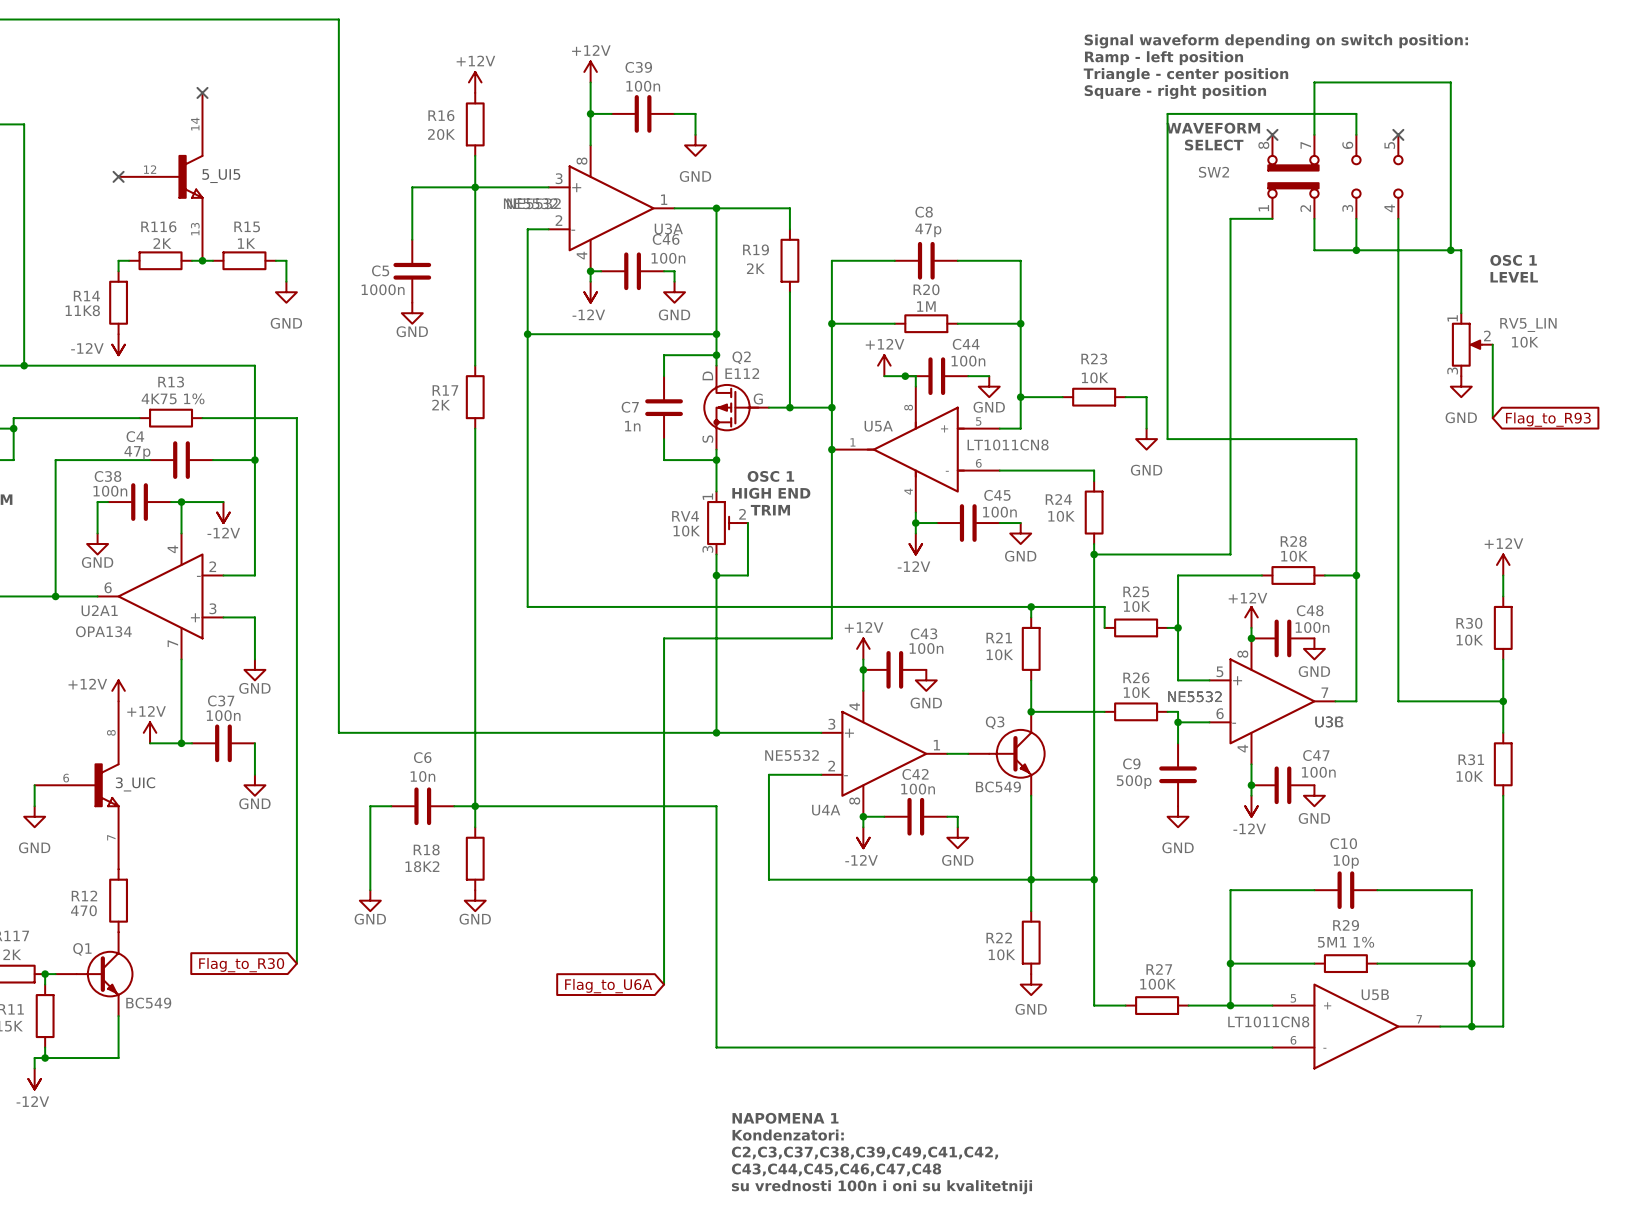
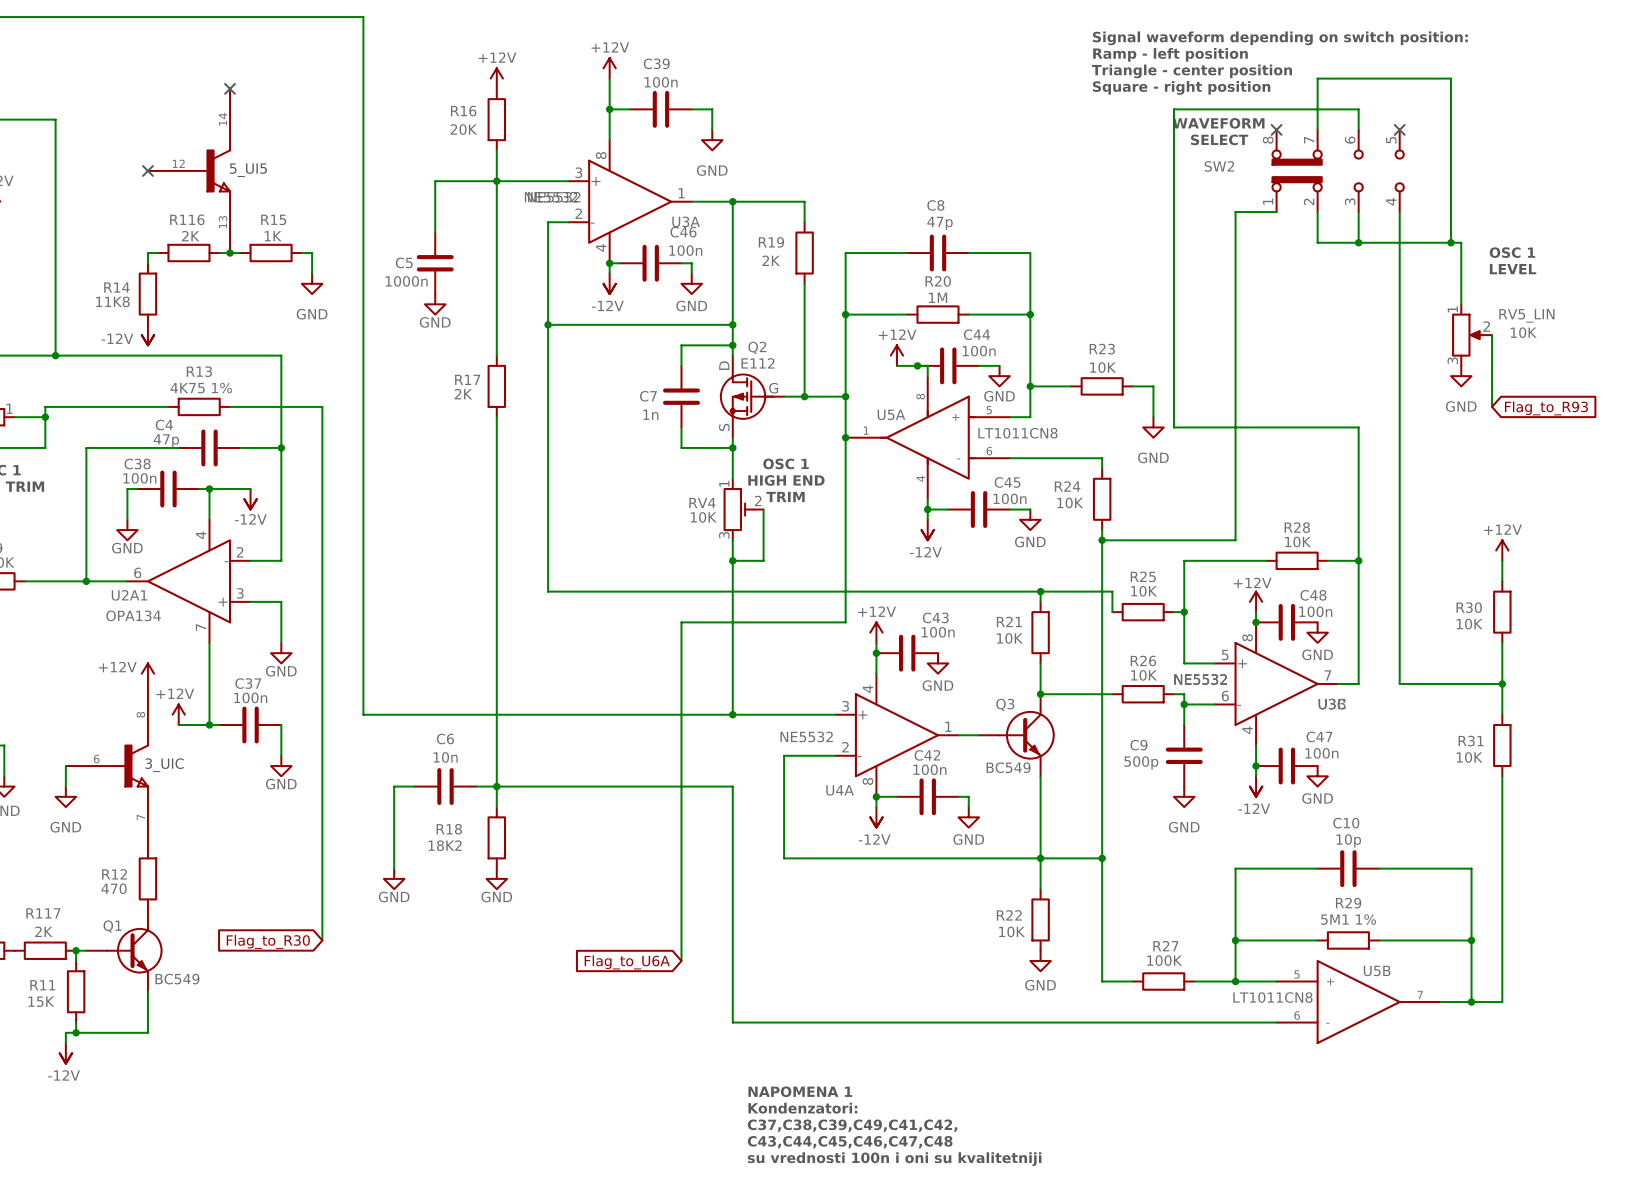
text: C2,C3,C37,C38,C39,C49,C41,C42, (864, 1152) -> C37,C38,C39,C49,C41,C42, (852, 1125)

